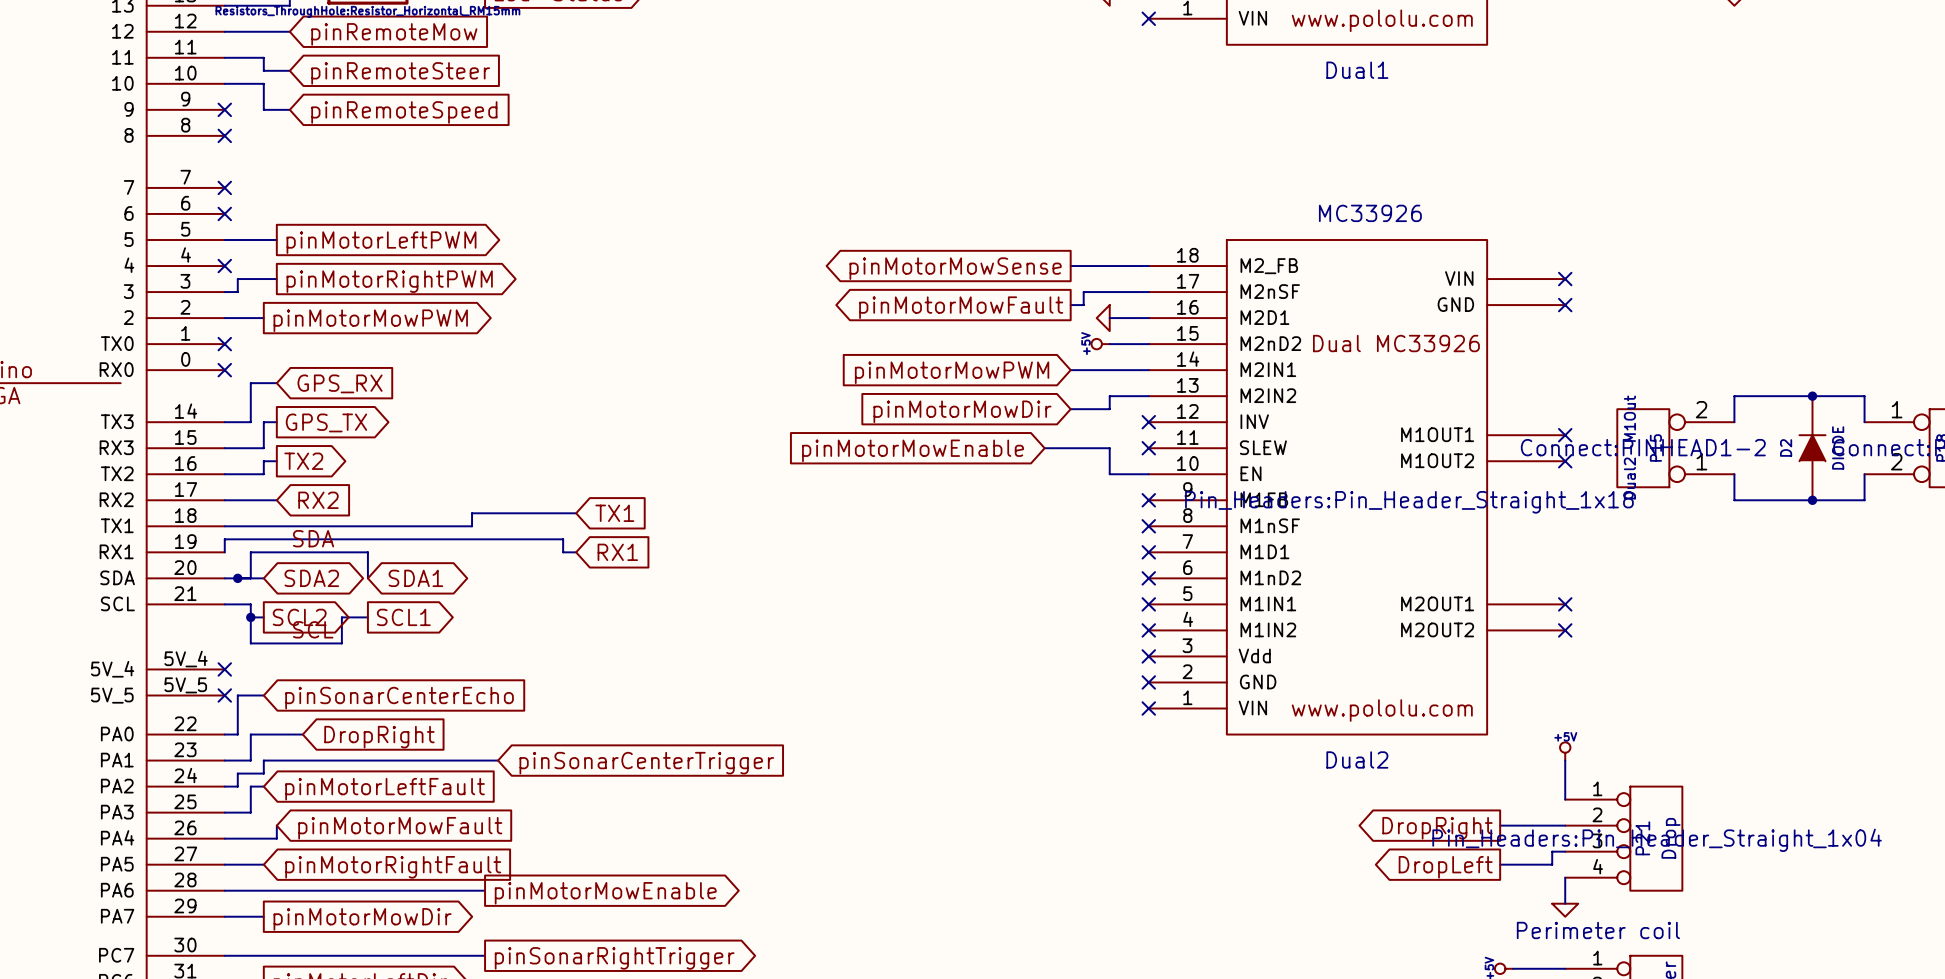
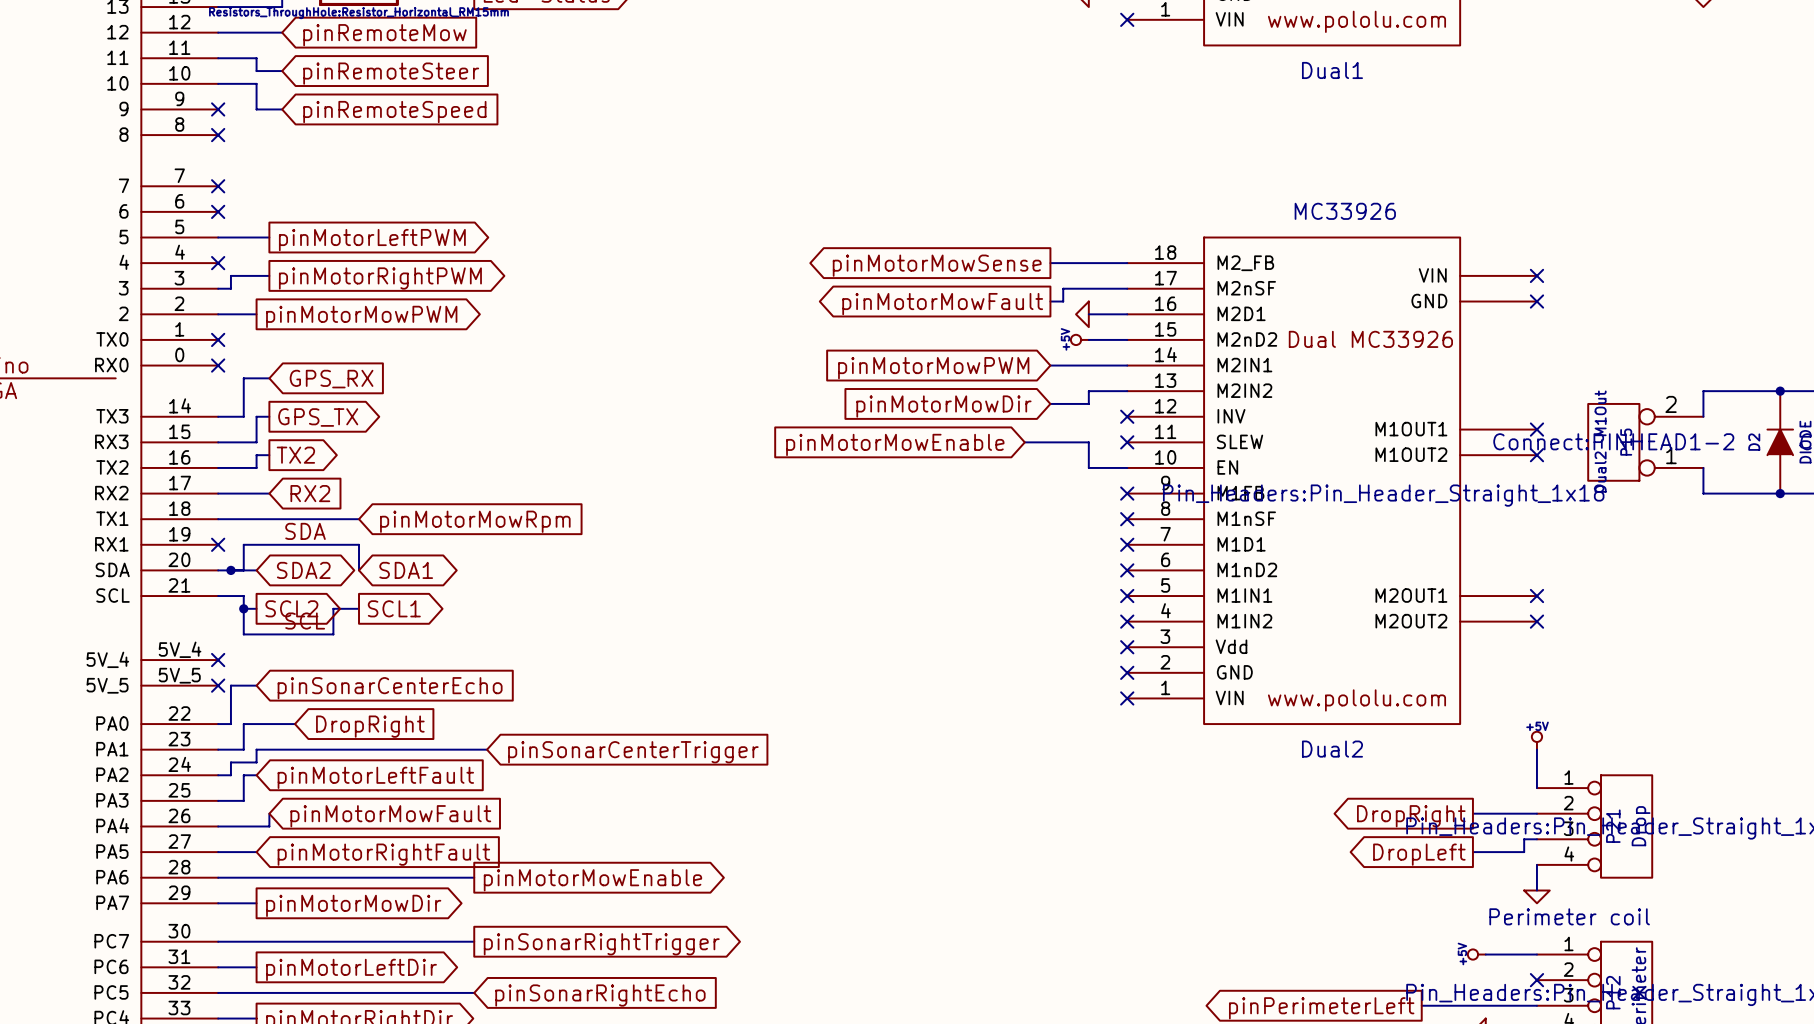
wire: (576, 513) (472, 513) (472, 526) (367, 526) -> none
global label: TX1 (614, 513) -> none
global label: none -> pinMotorMowRpm (475, 521)
wire: (224, 552) (224, 539) (563, 539) (563, 552) (576, 552) -> none
no-connect mark: none -> (218, 544)
global label: RX1 (617, 552) -> none

